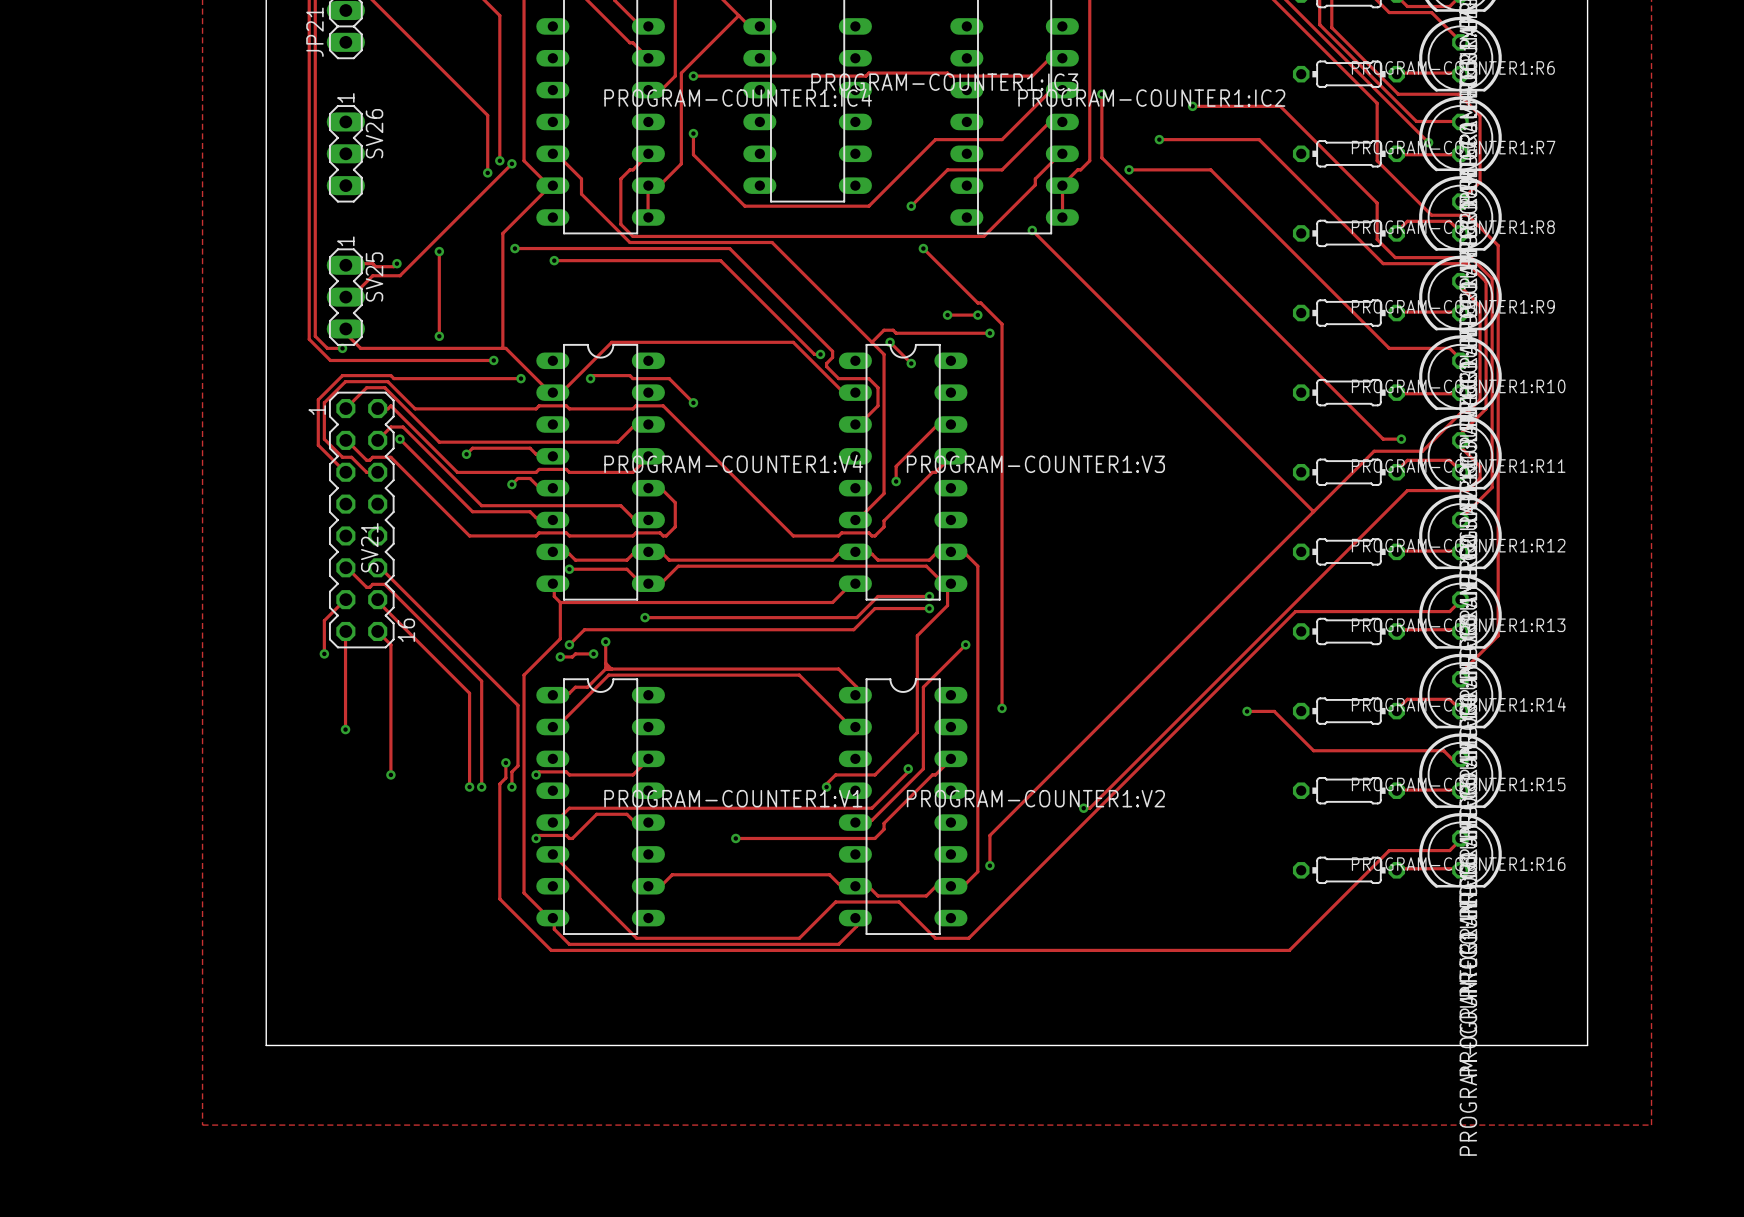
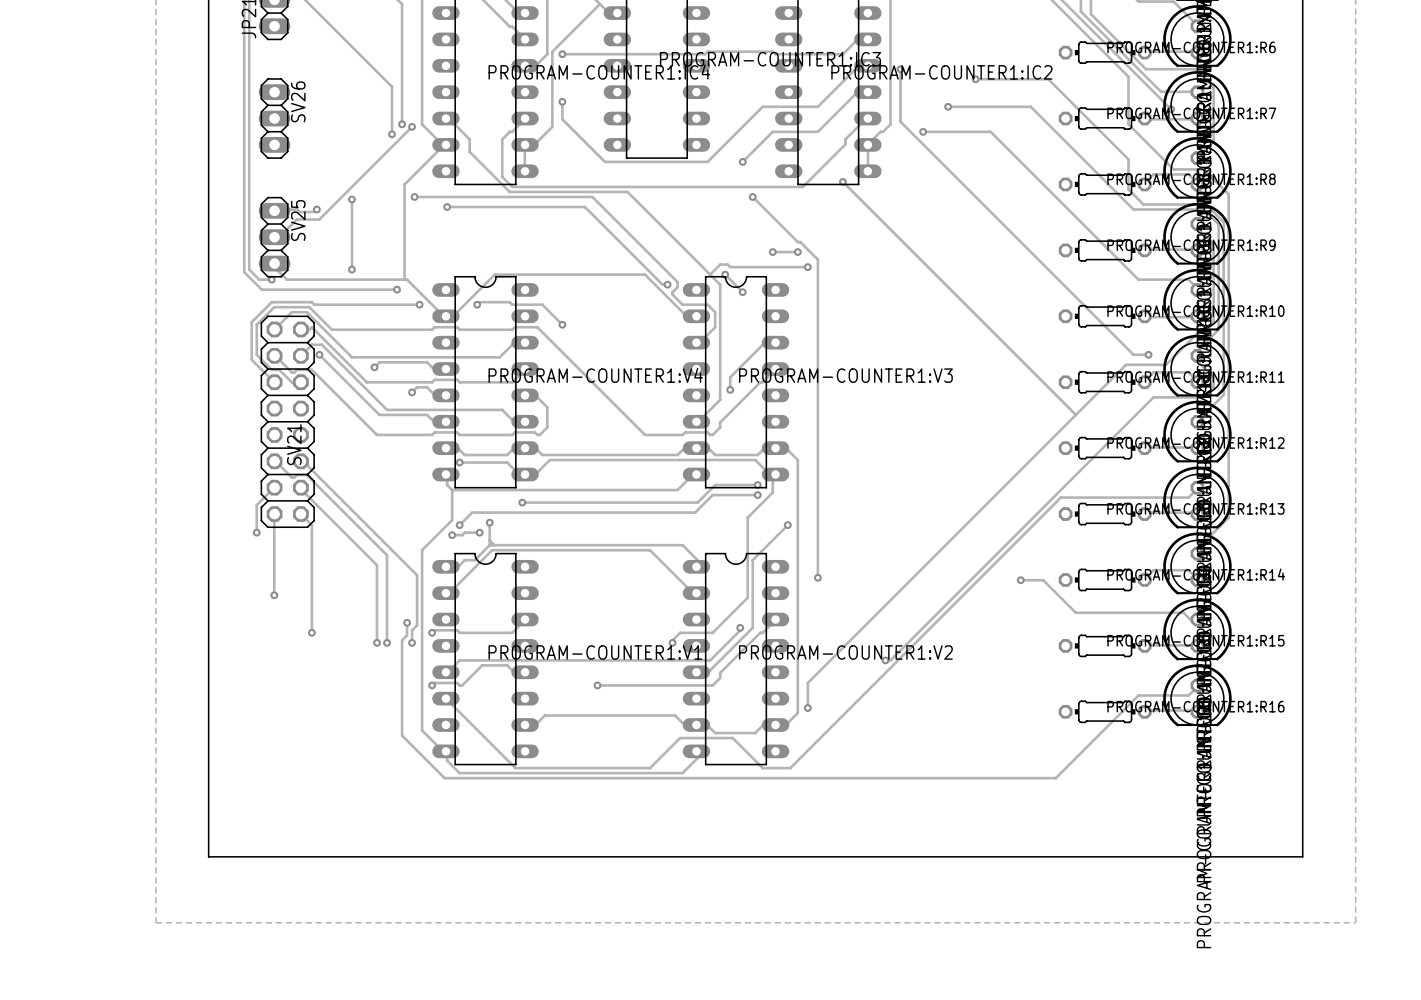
SV26 footprint: [326, 105, 365, 203] -> [258, 78, 291, 159]
SV25 footprint: [326, 248, 365, 346] -> [258, 196, 291, 278]
SV21 footprint: [328, 391, 395, 649] -> [260, 315, 315, 529]

